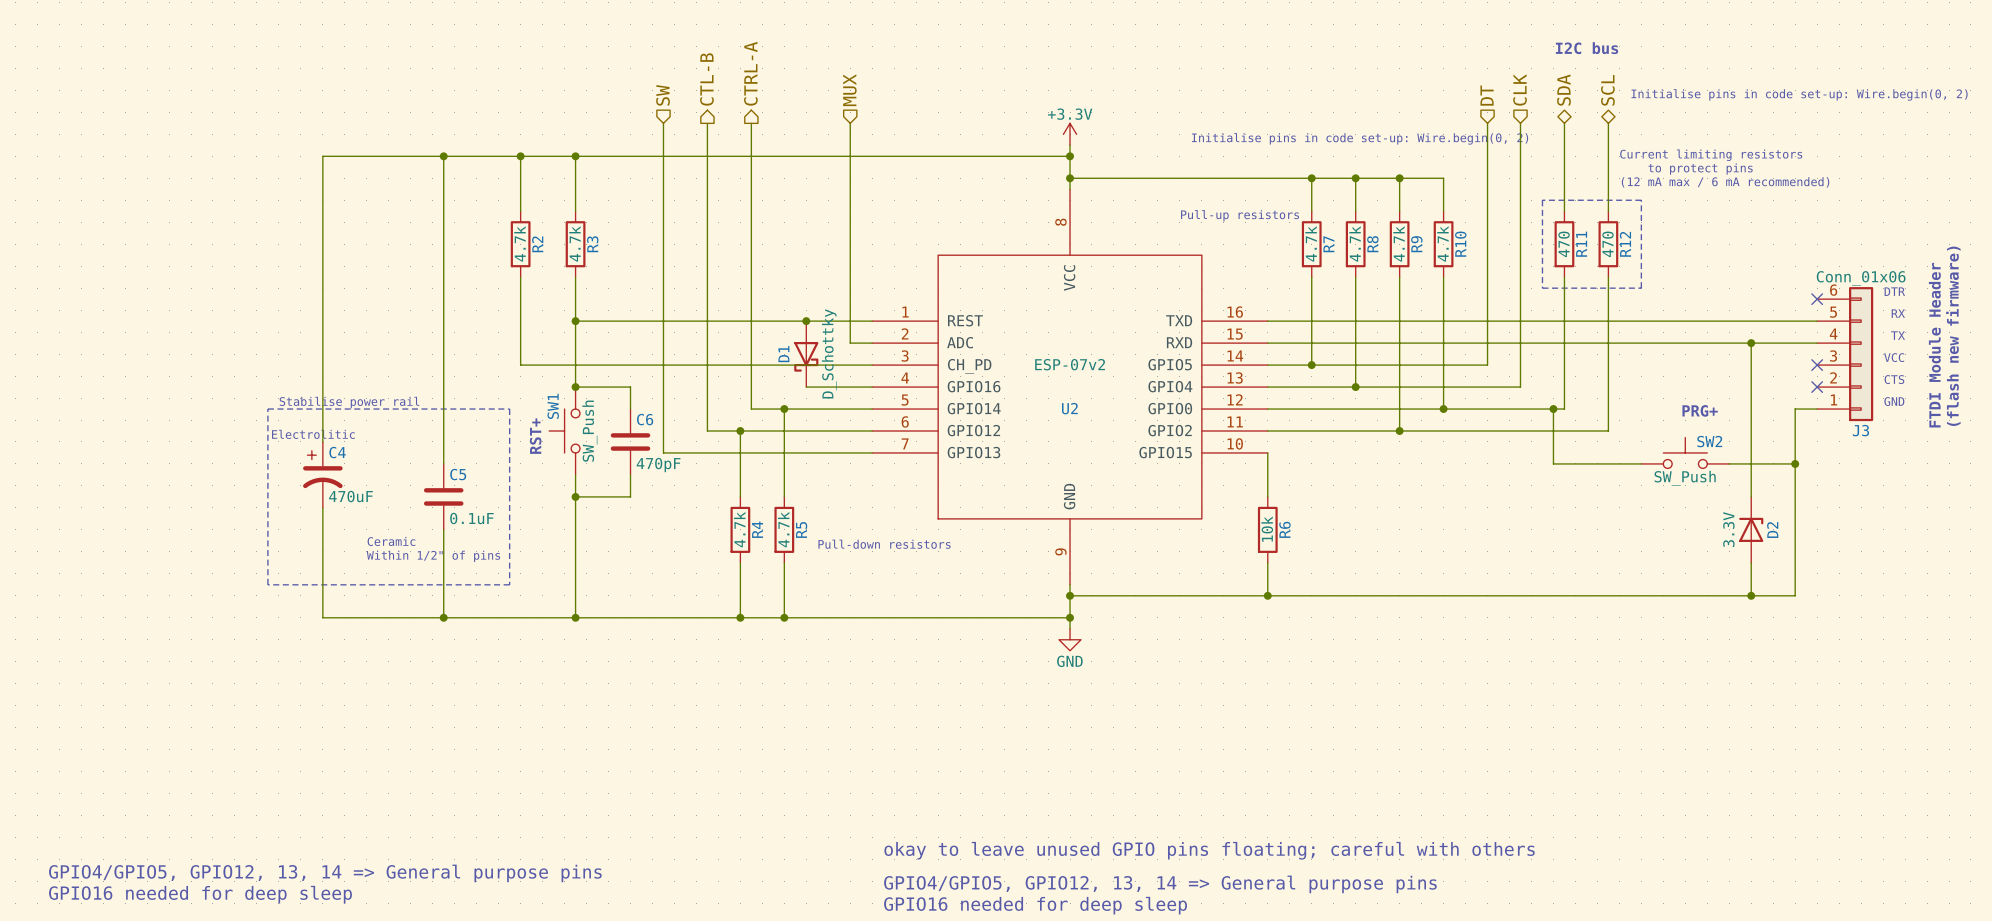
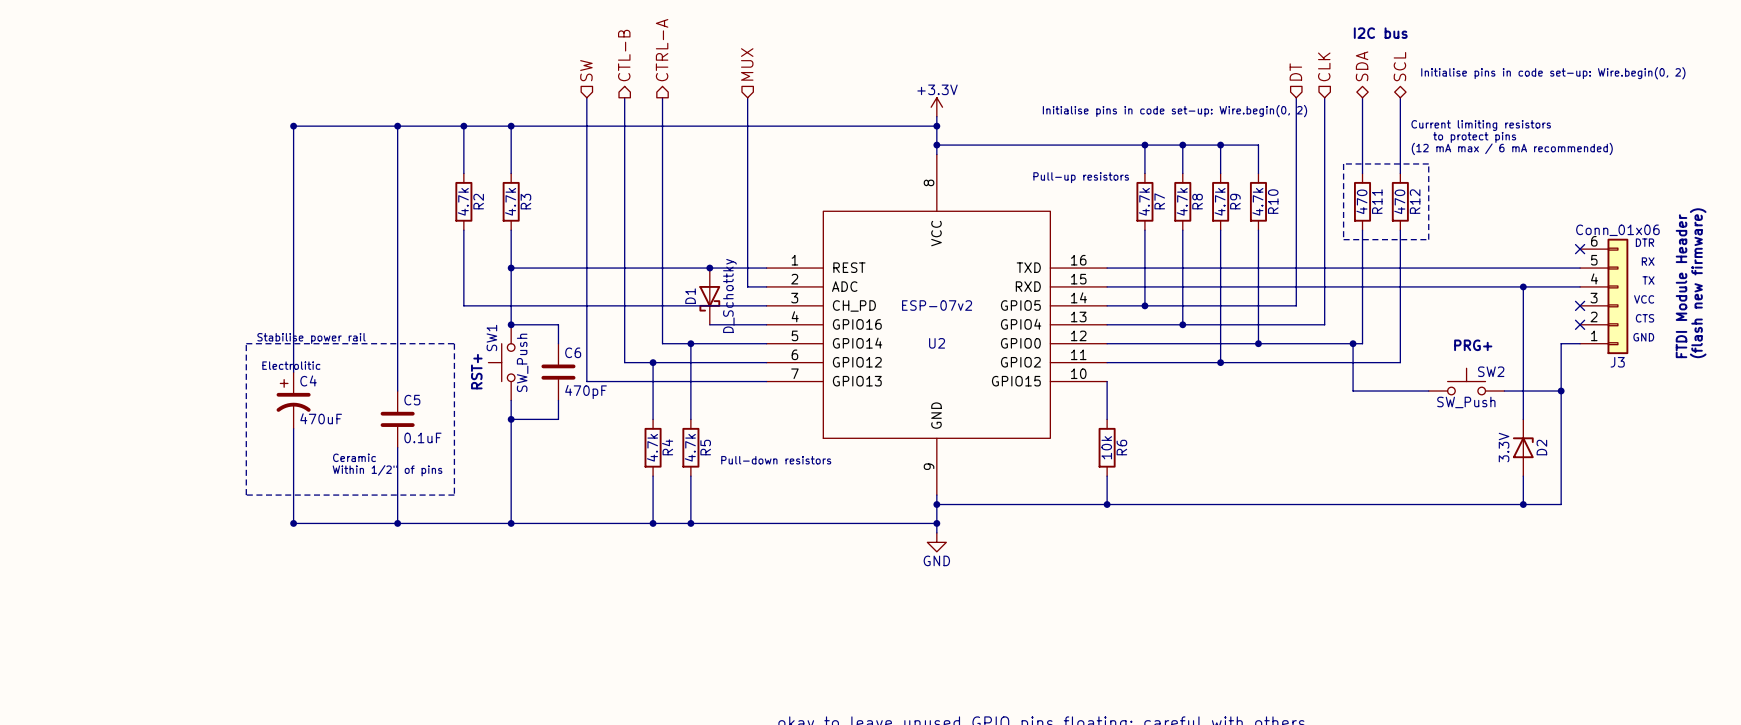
junction: none -> (293, 126)
junction: none -> (293, 523)

